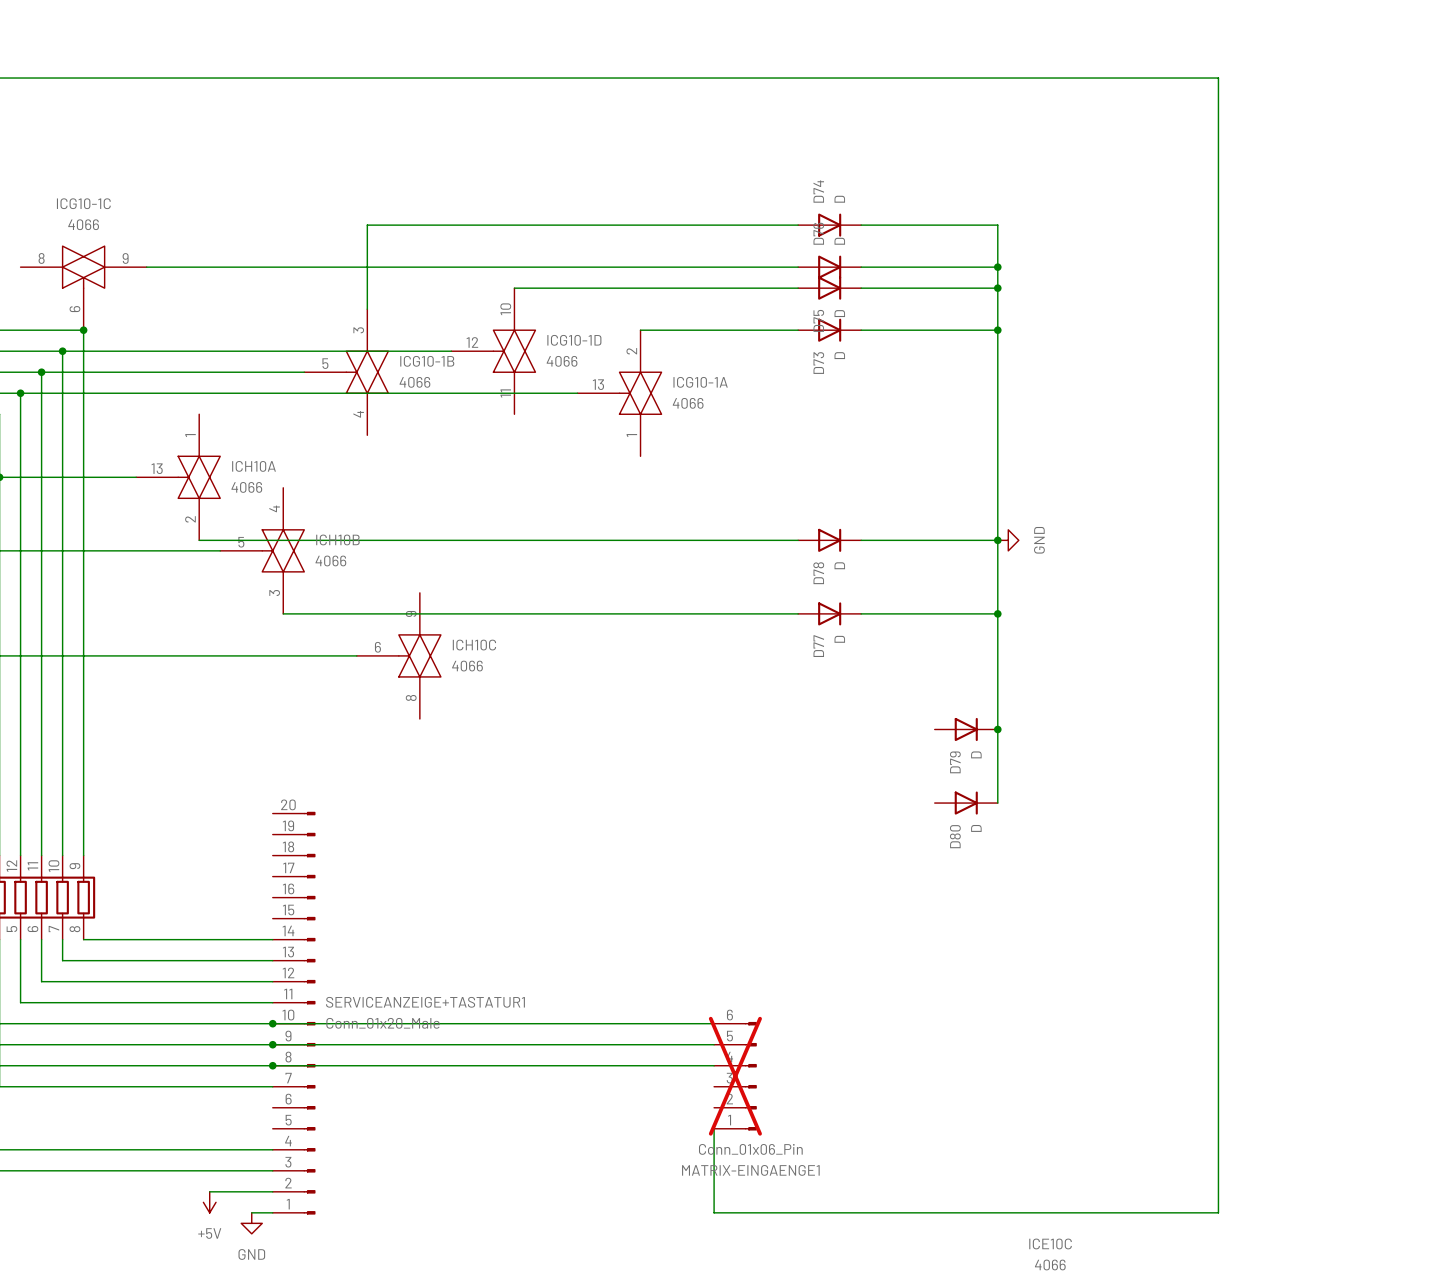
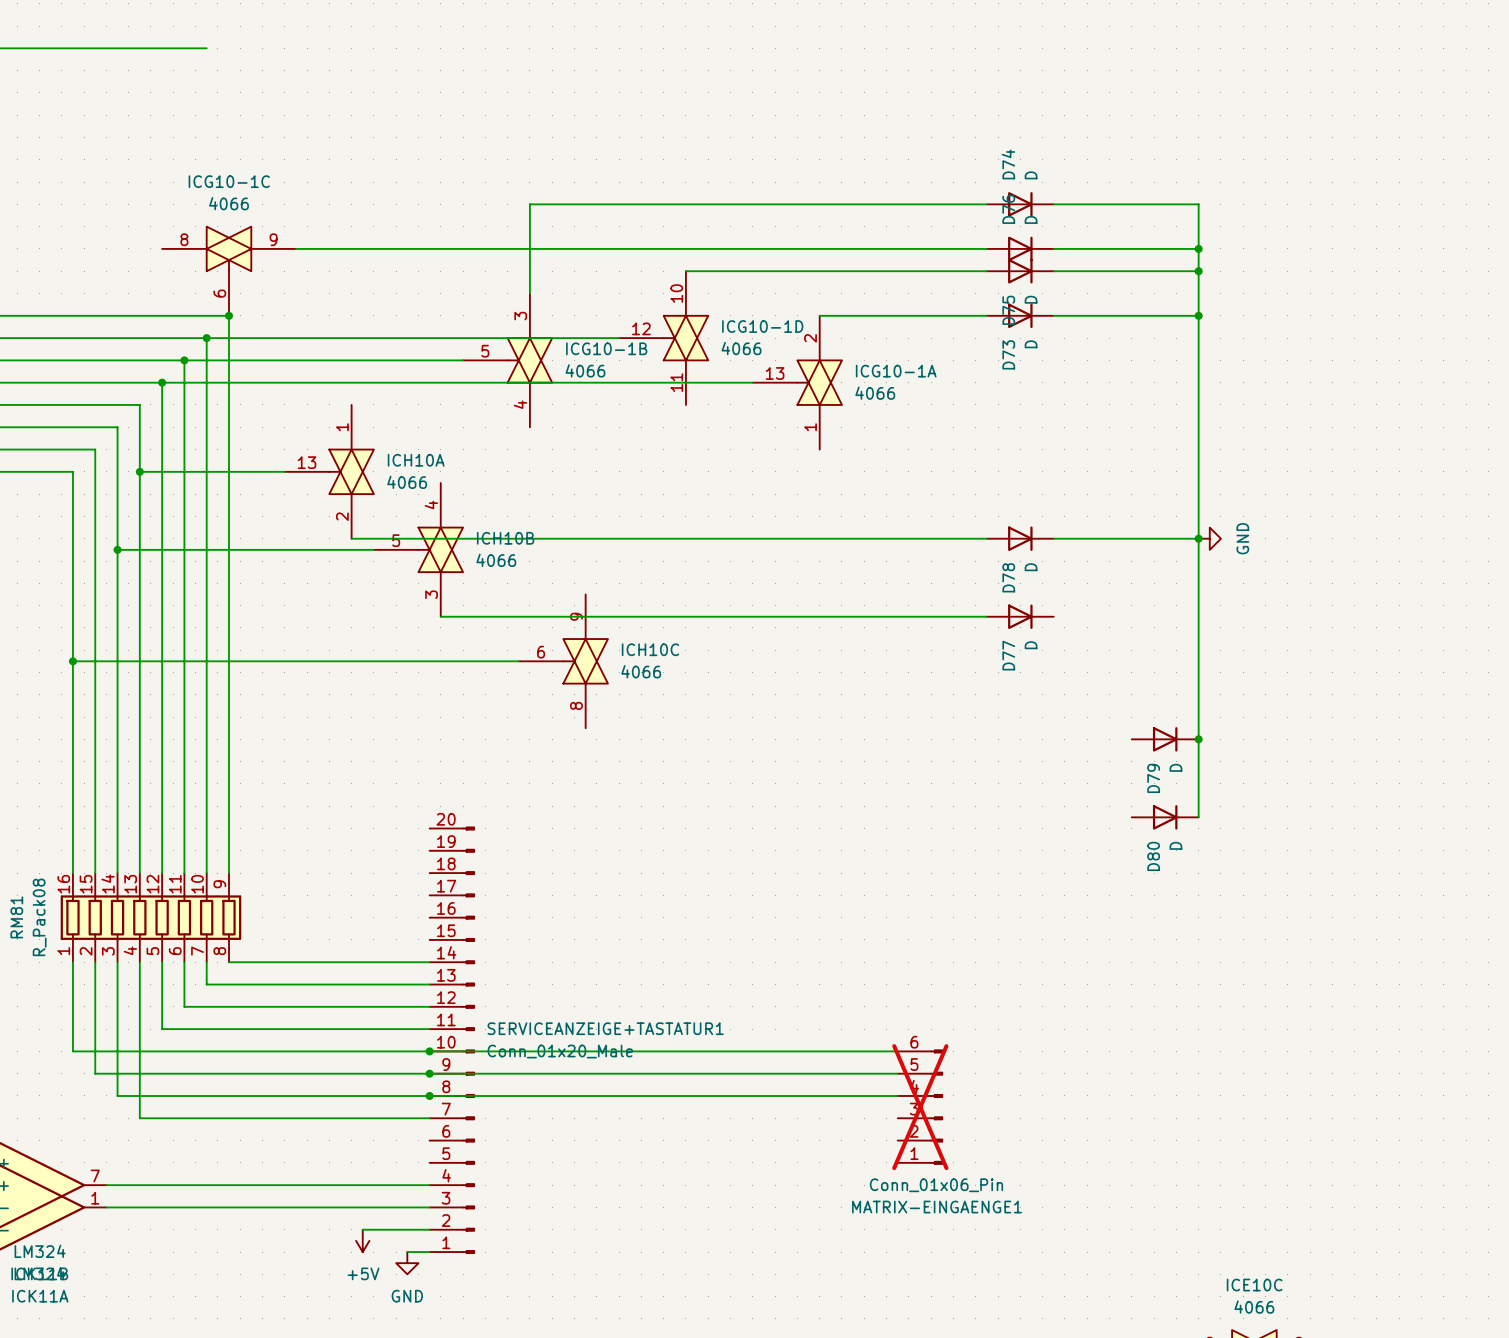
wire: (62, 78) (1218, 78) (1218, 1212) (714, 1212) (714, 1128) -> none
wire: (861, 613) (997, 613) -> none
junction: (997, 613) -> none

